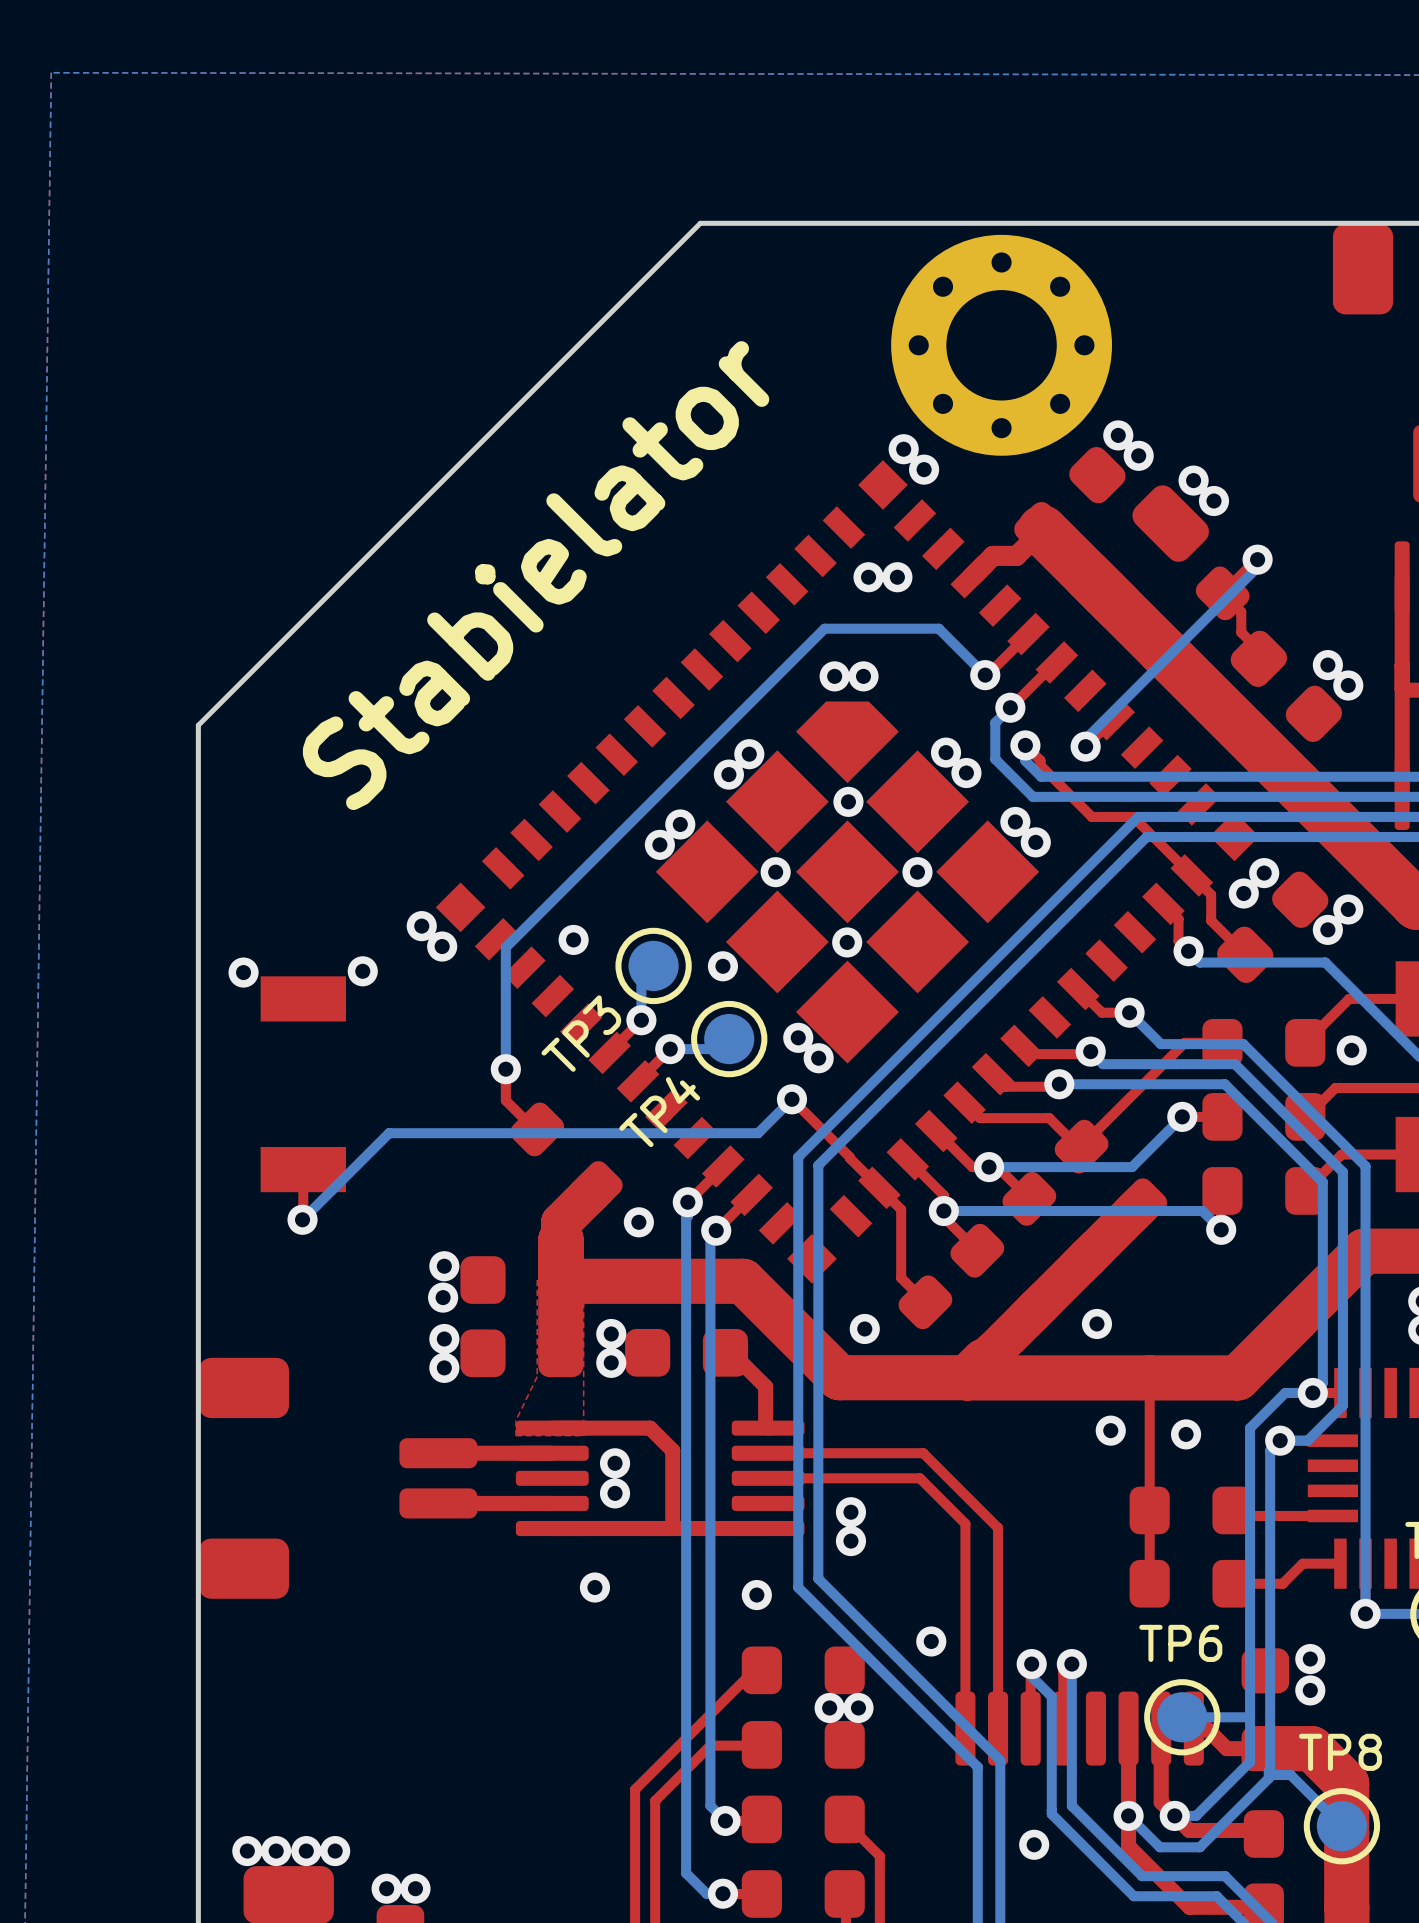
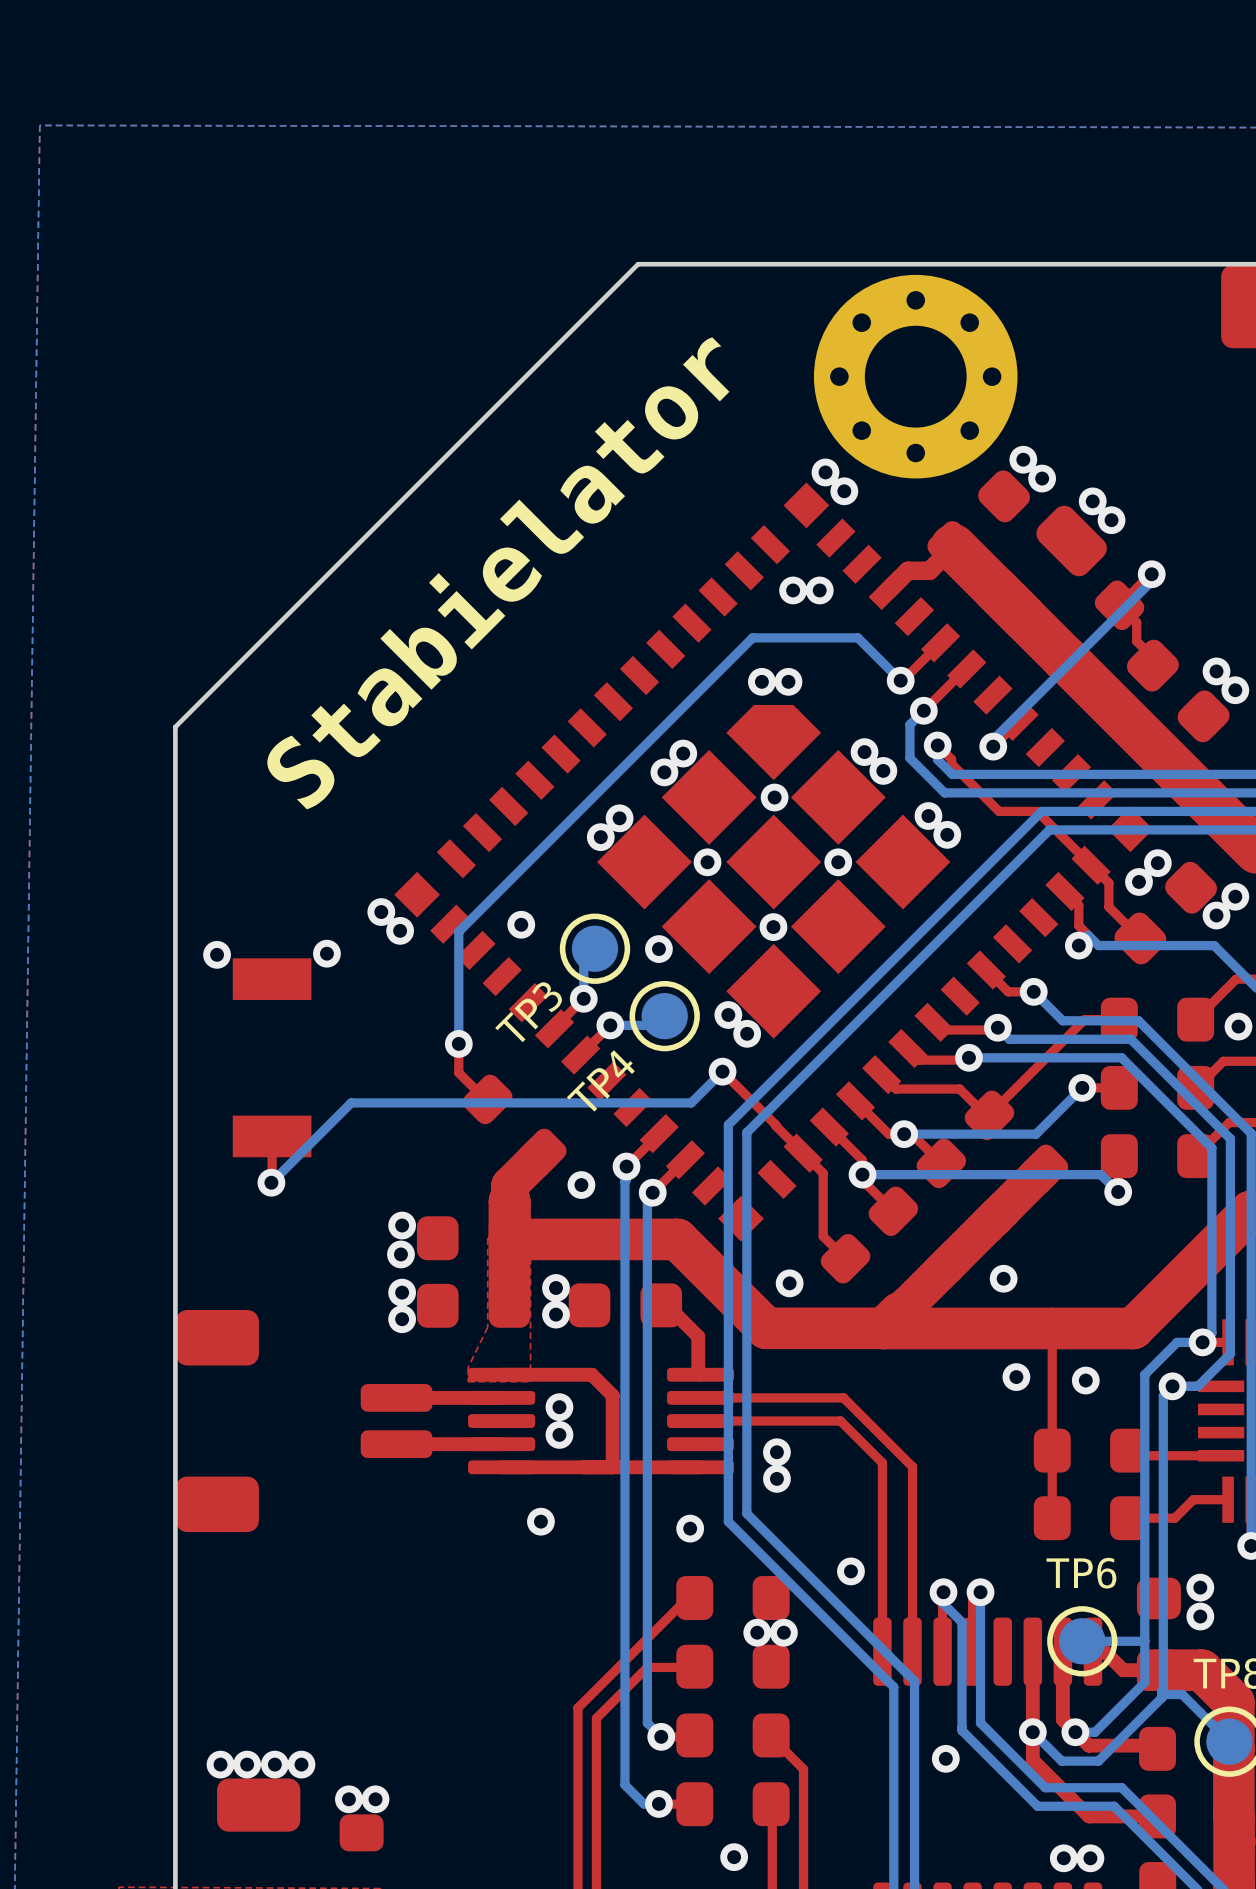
via position: (1188, 951) -> (1078, 945)

